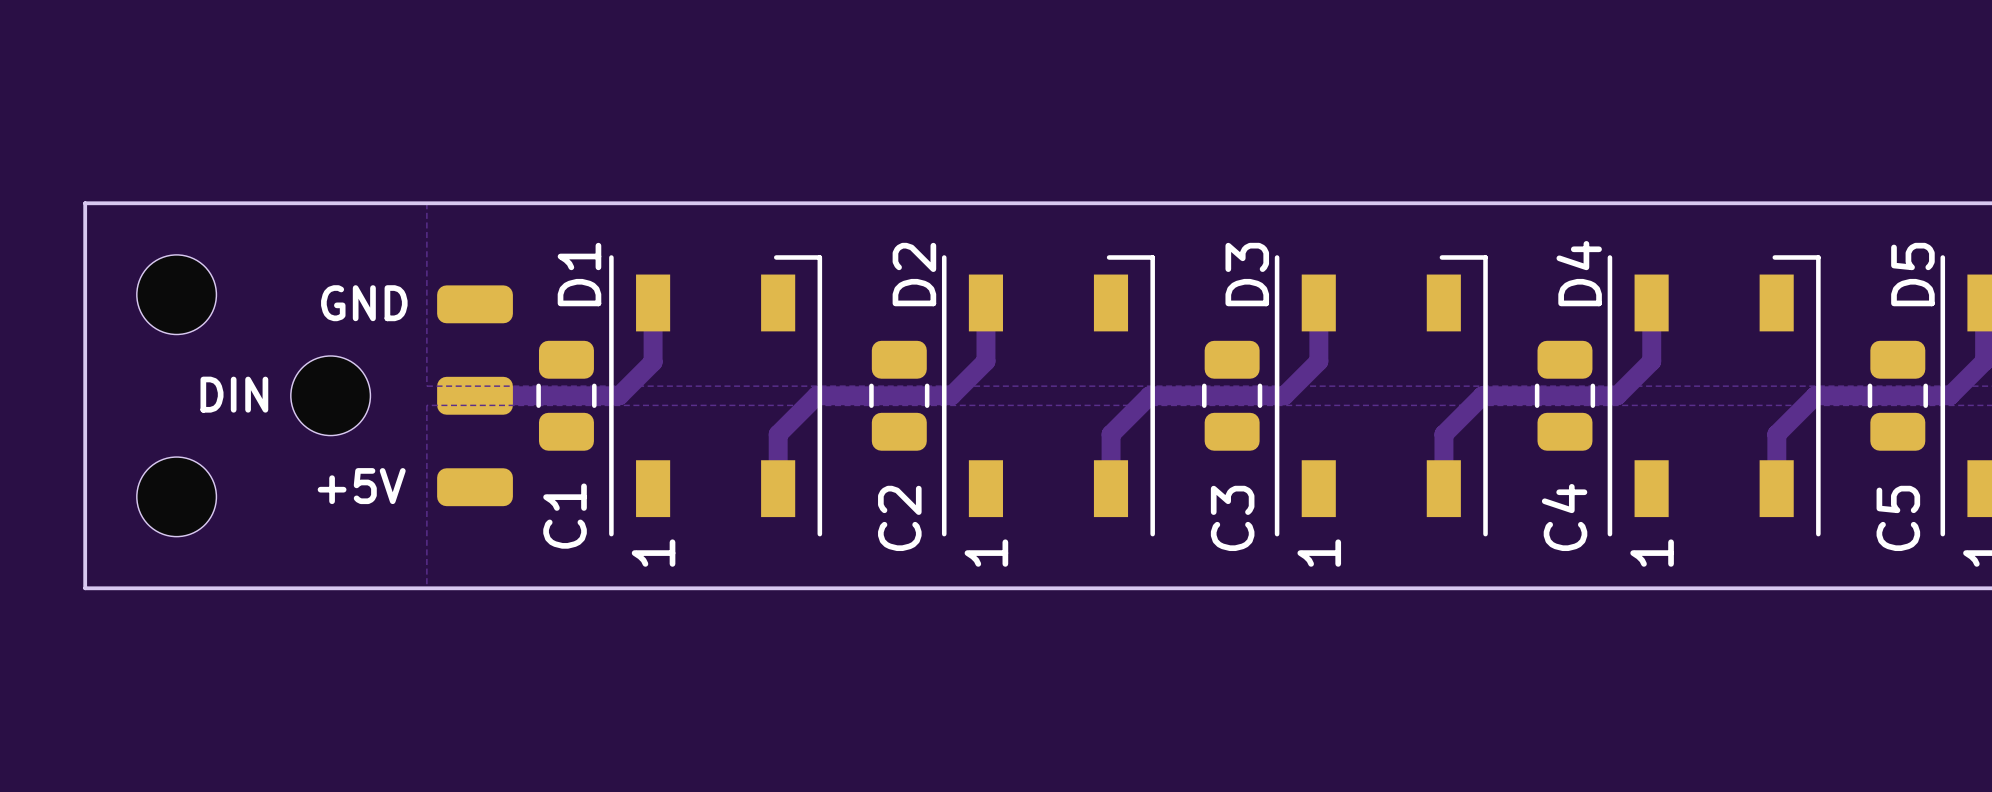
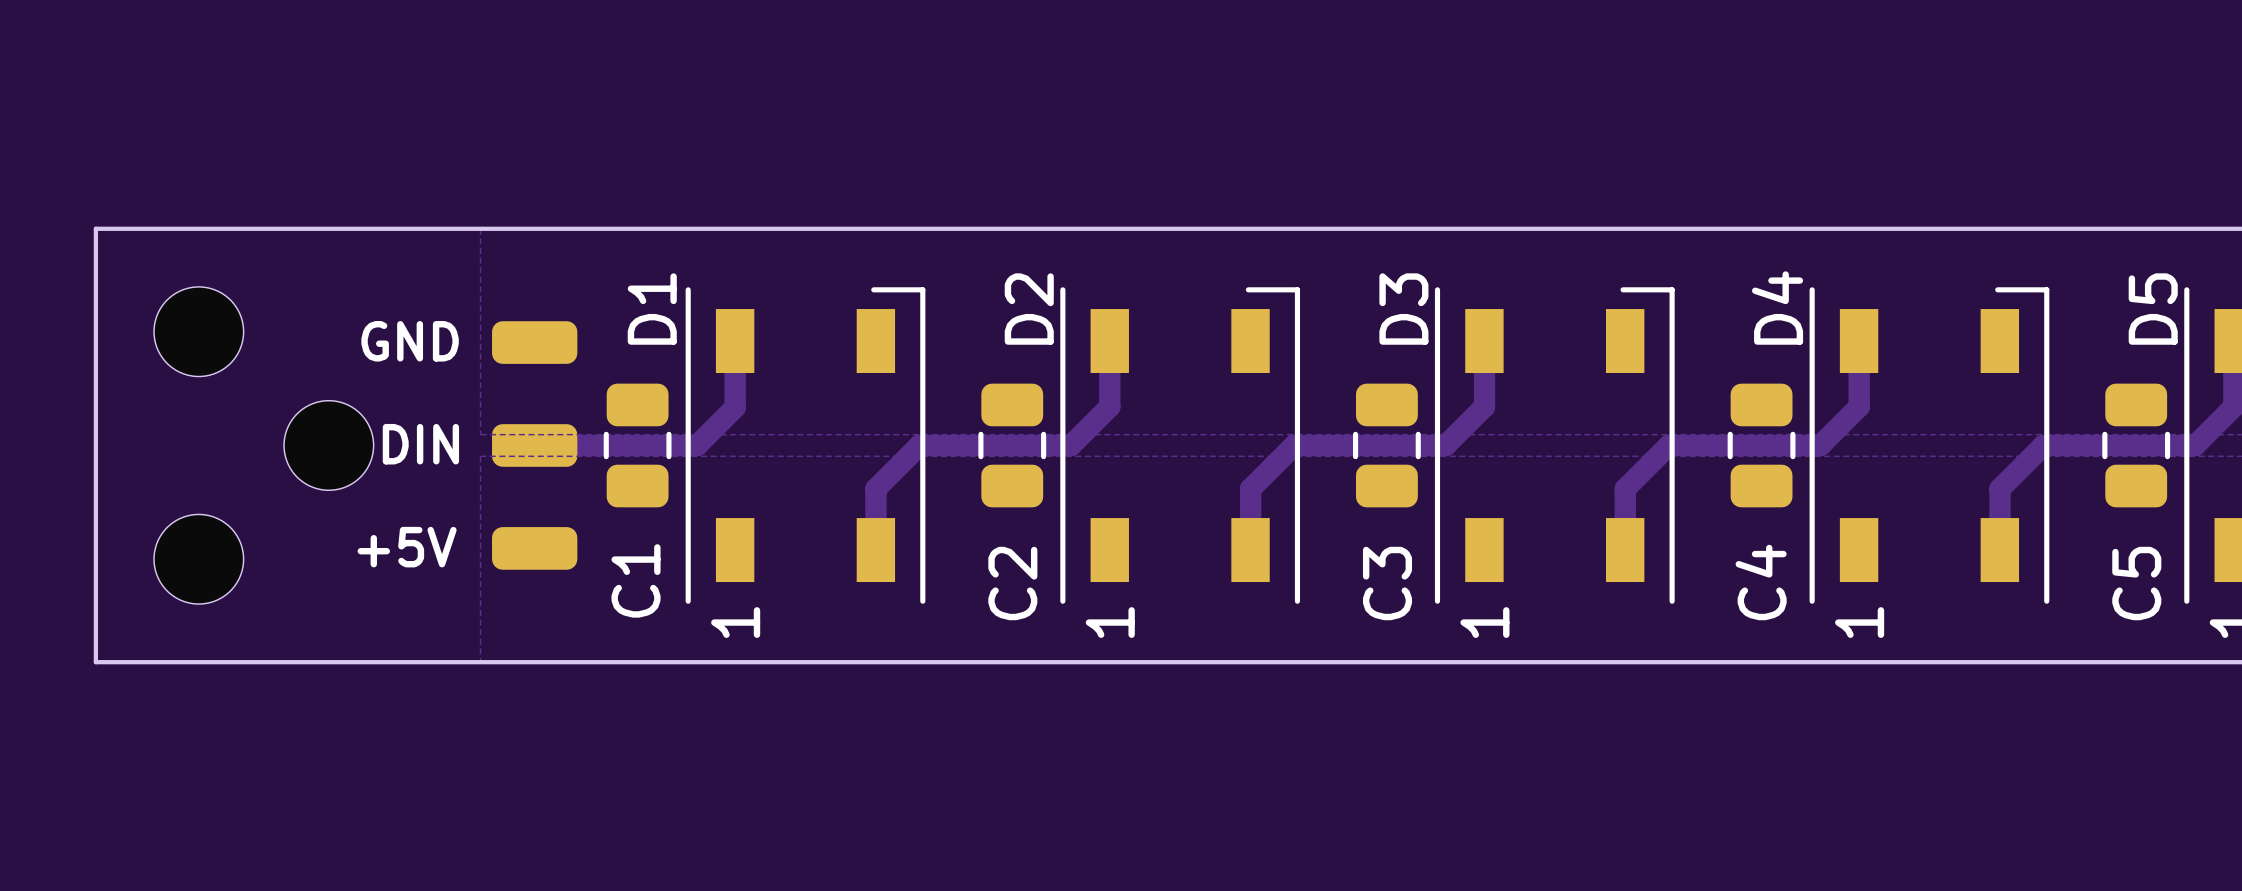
part value position: DIN (234, 394) -> DIN (420, 444)
part position: (330, 395) -> (328, 445)

